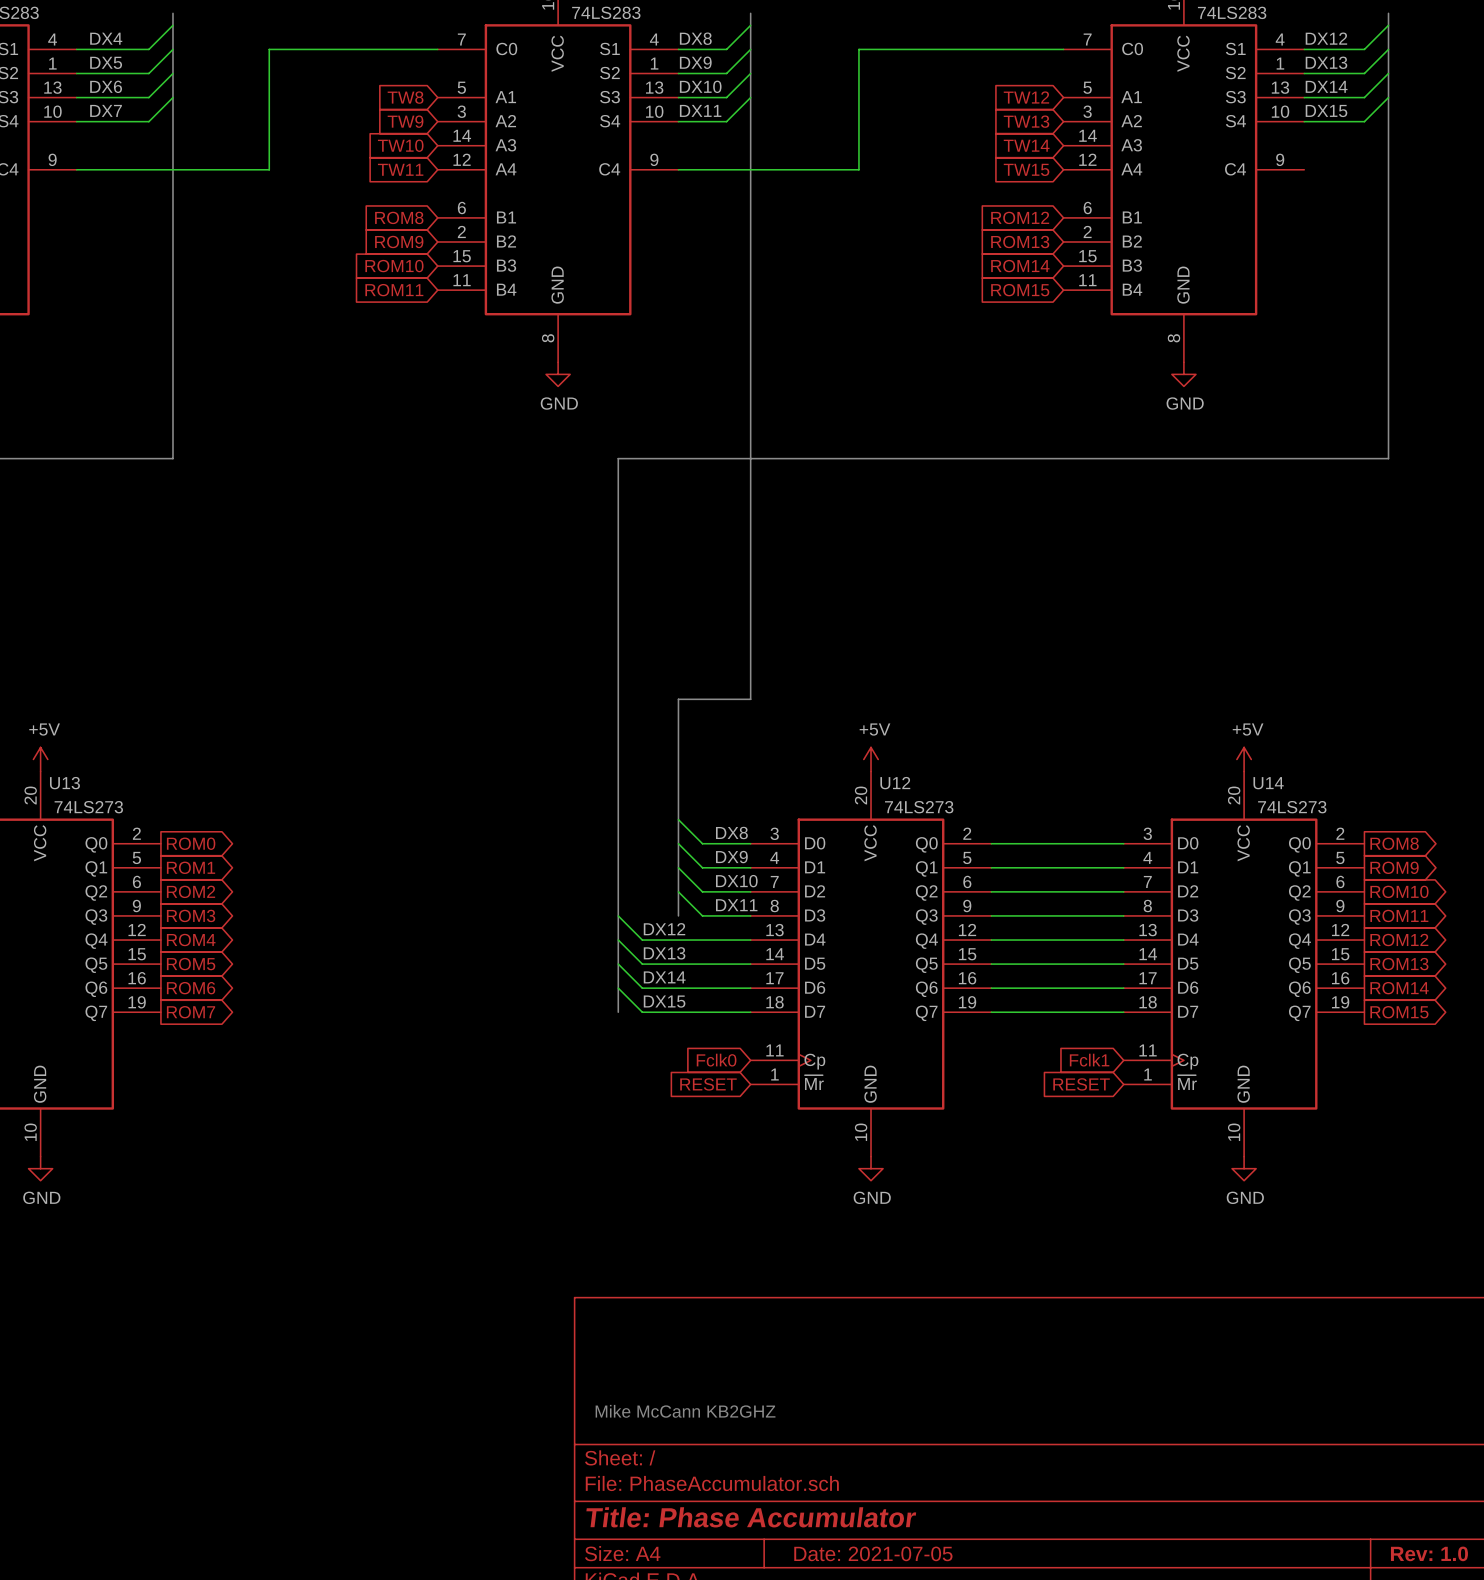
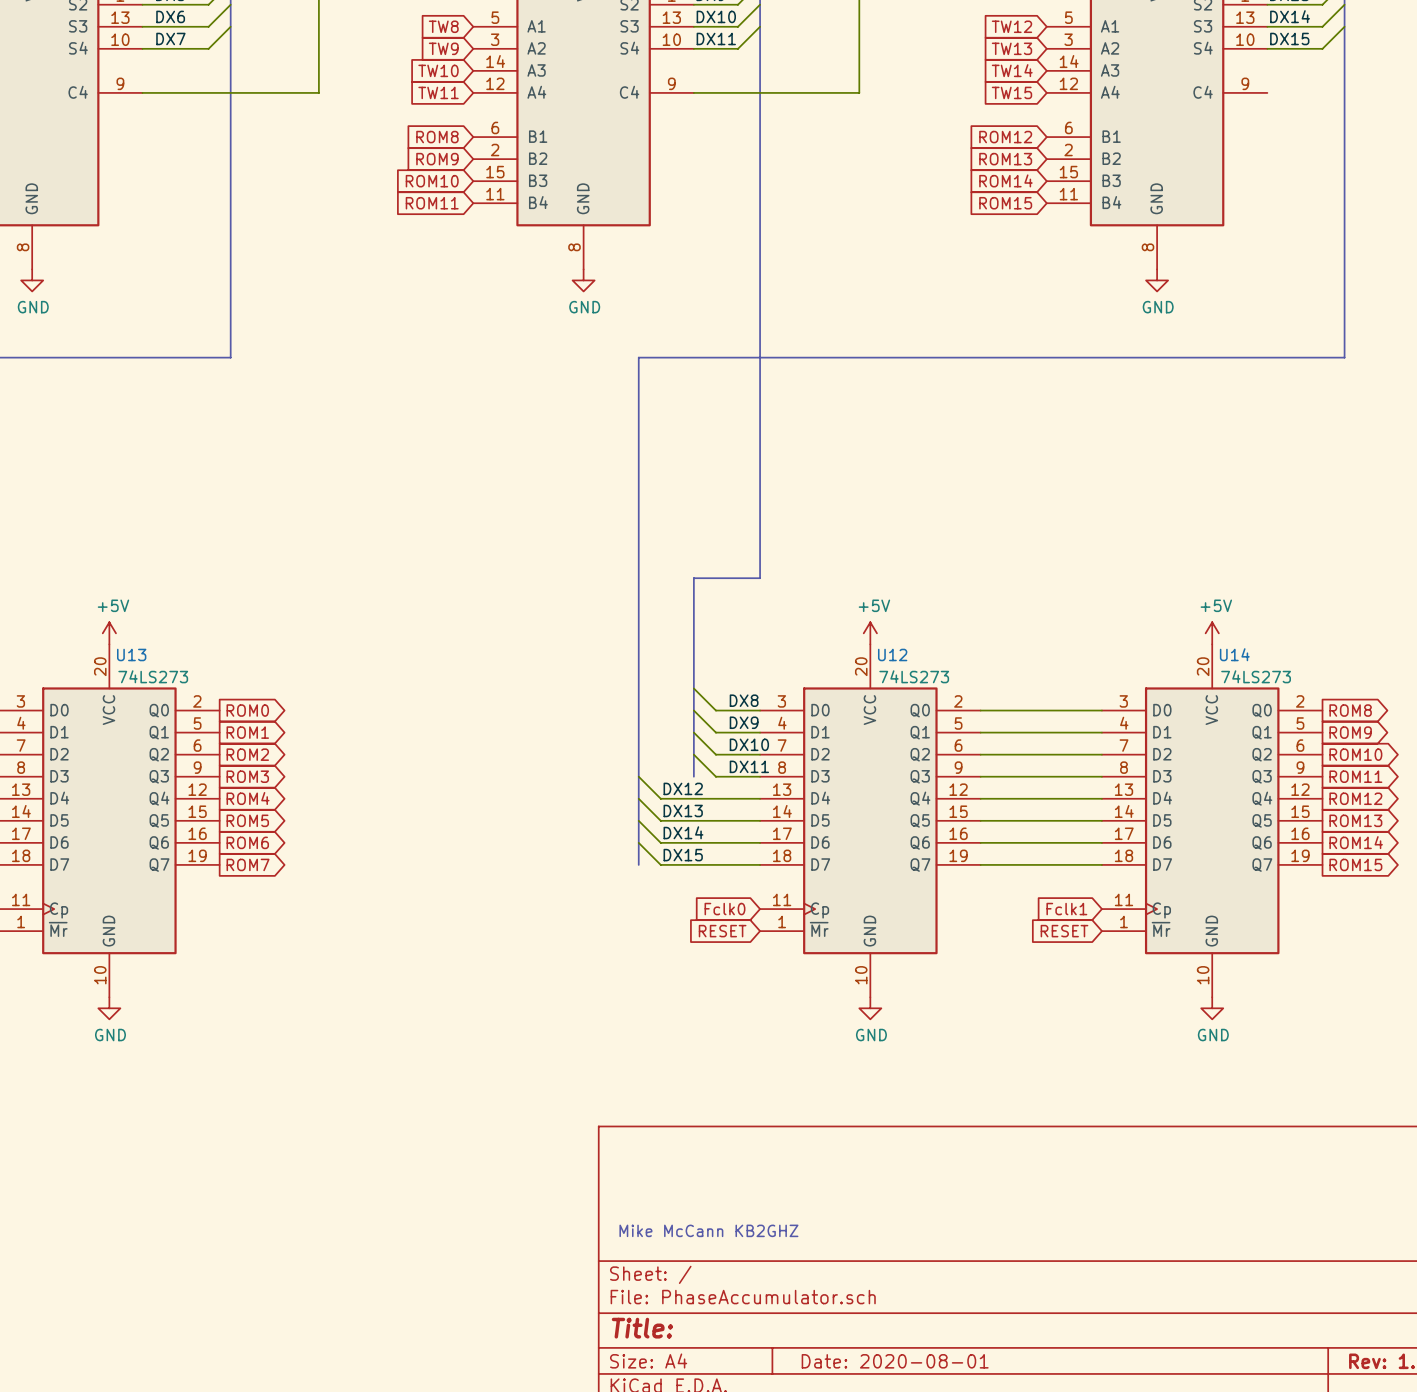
title block: Title: Phase Accumulator (751, 1517) -> Title: (642, 1328)
title block: Date: 2021-07-05 (873, 1553) -> Date: 2020-08-01 (895, 1361)

